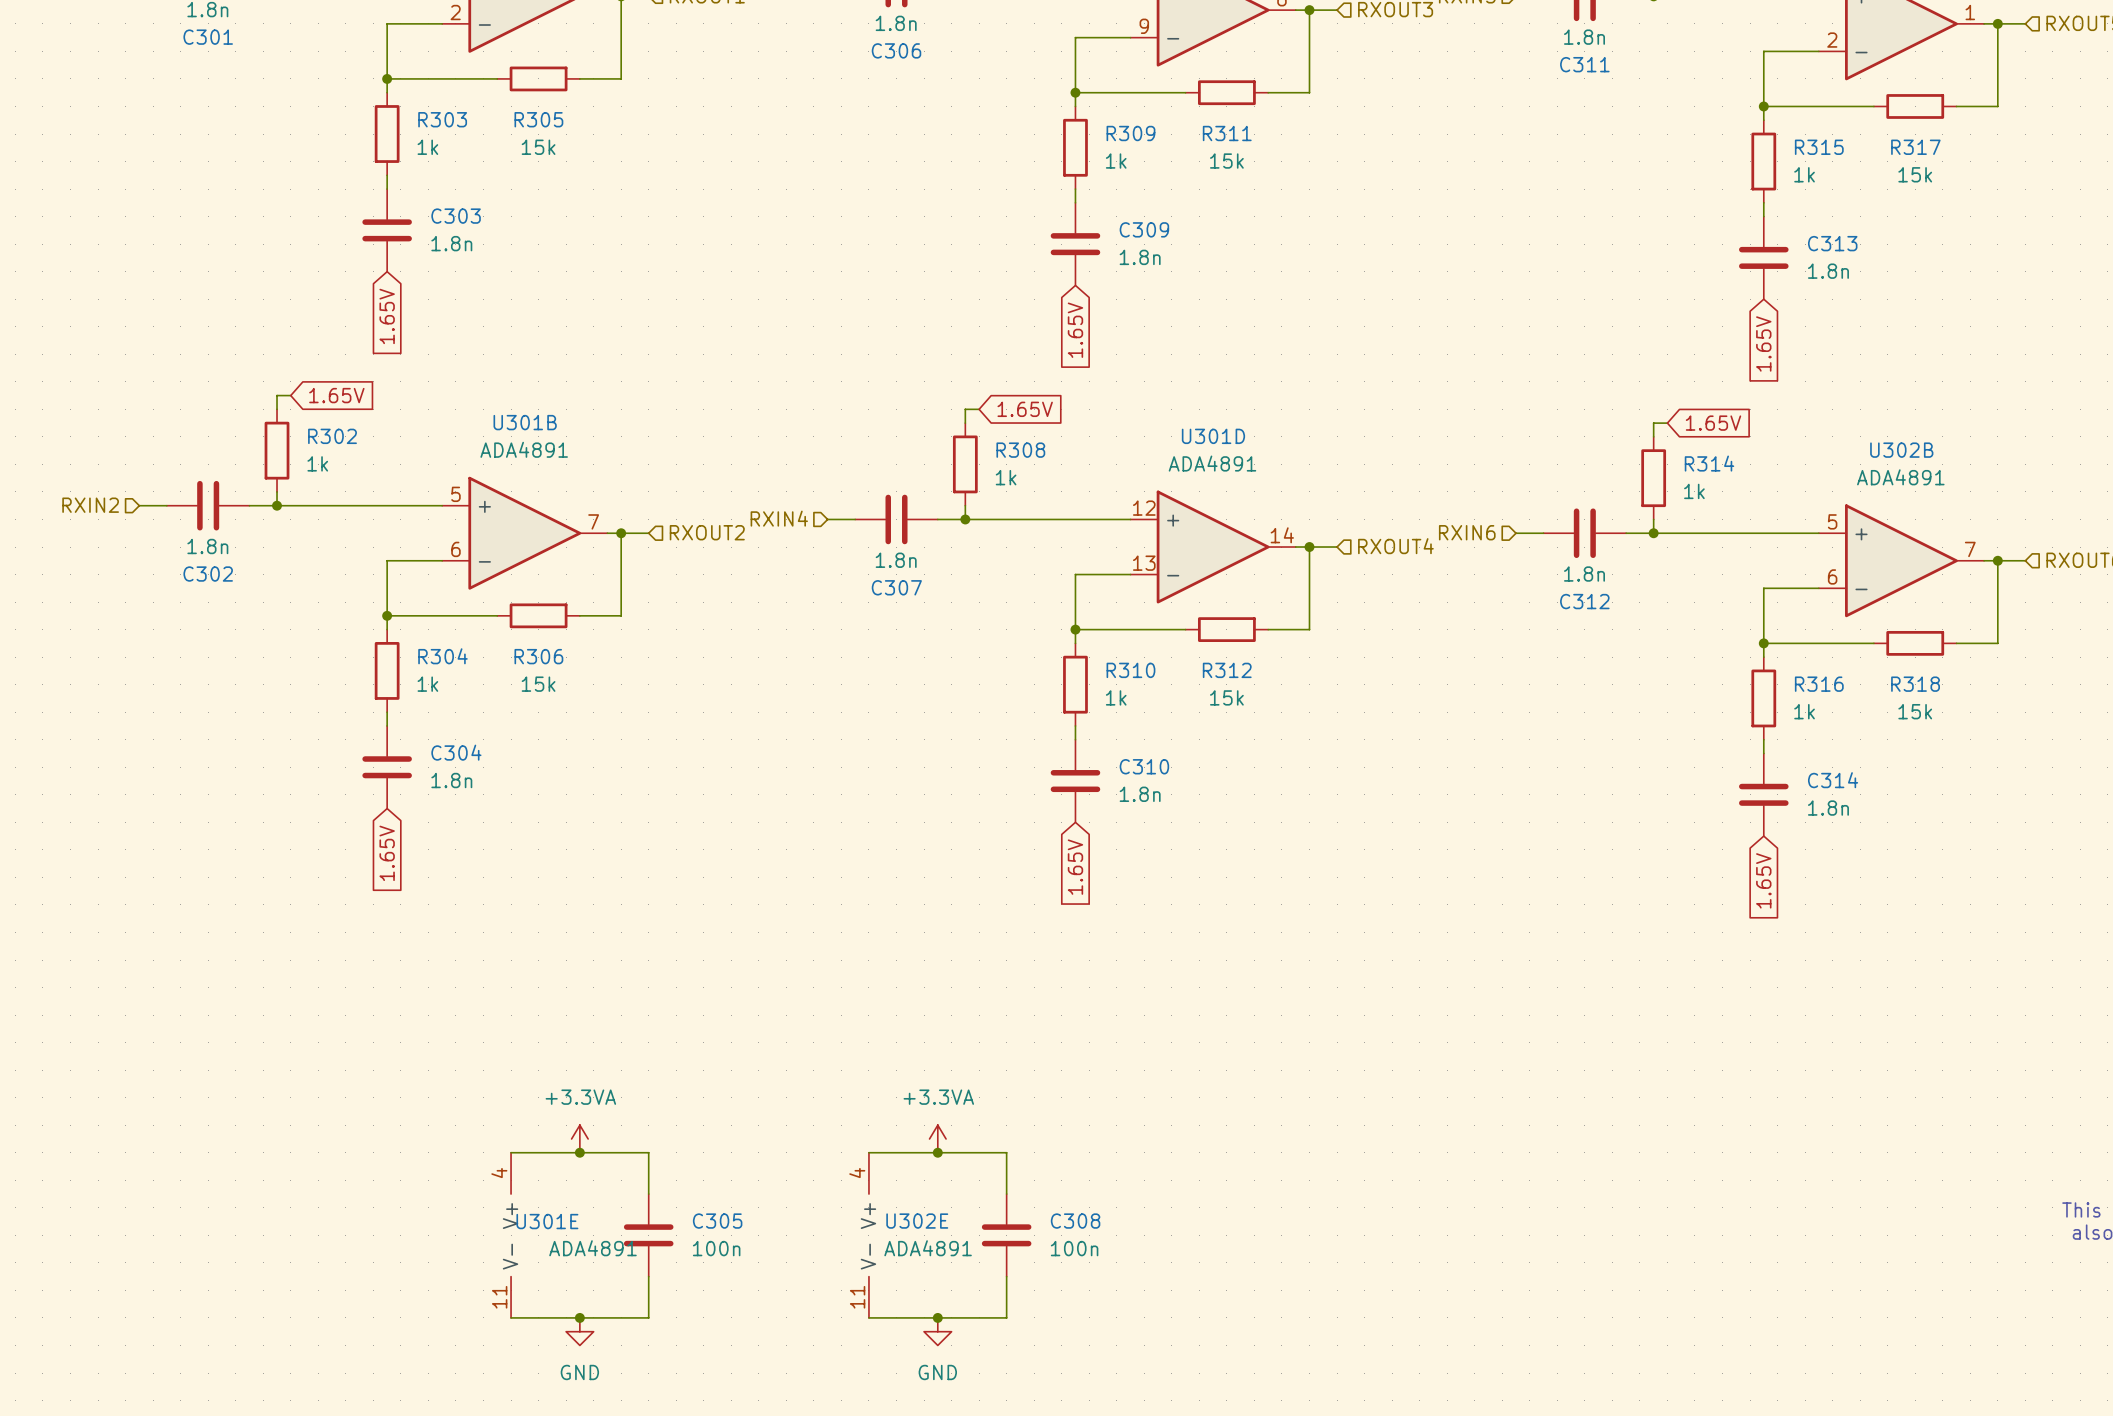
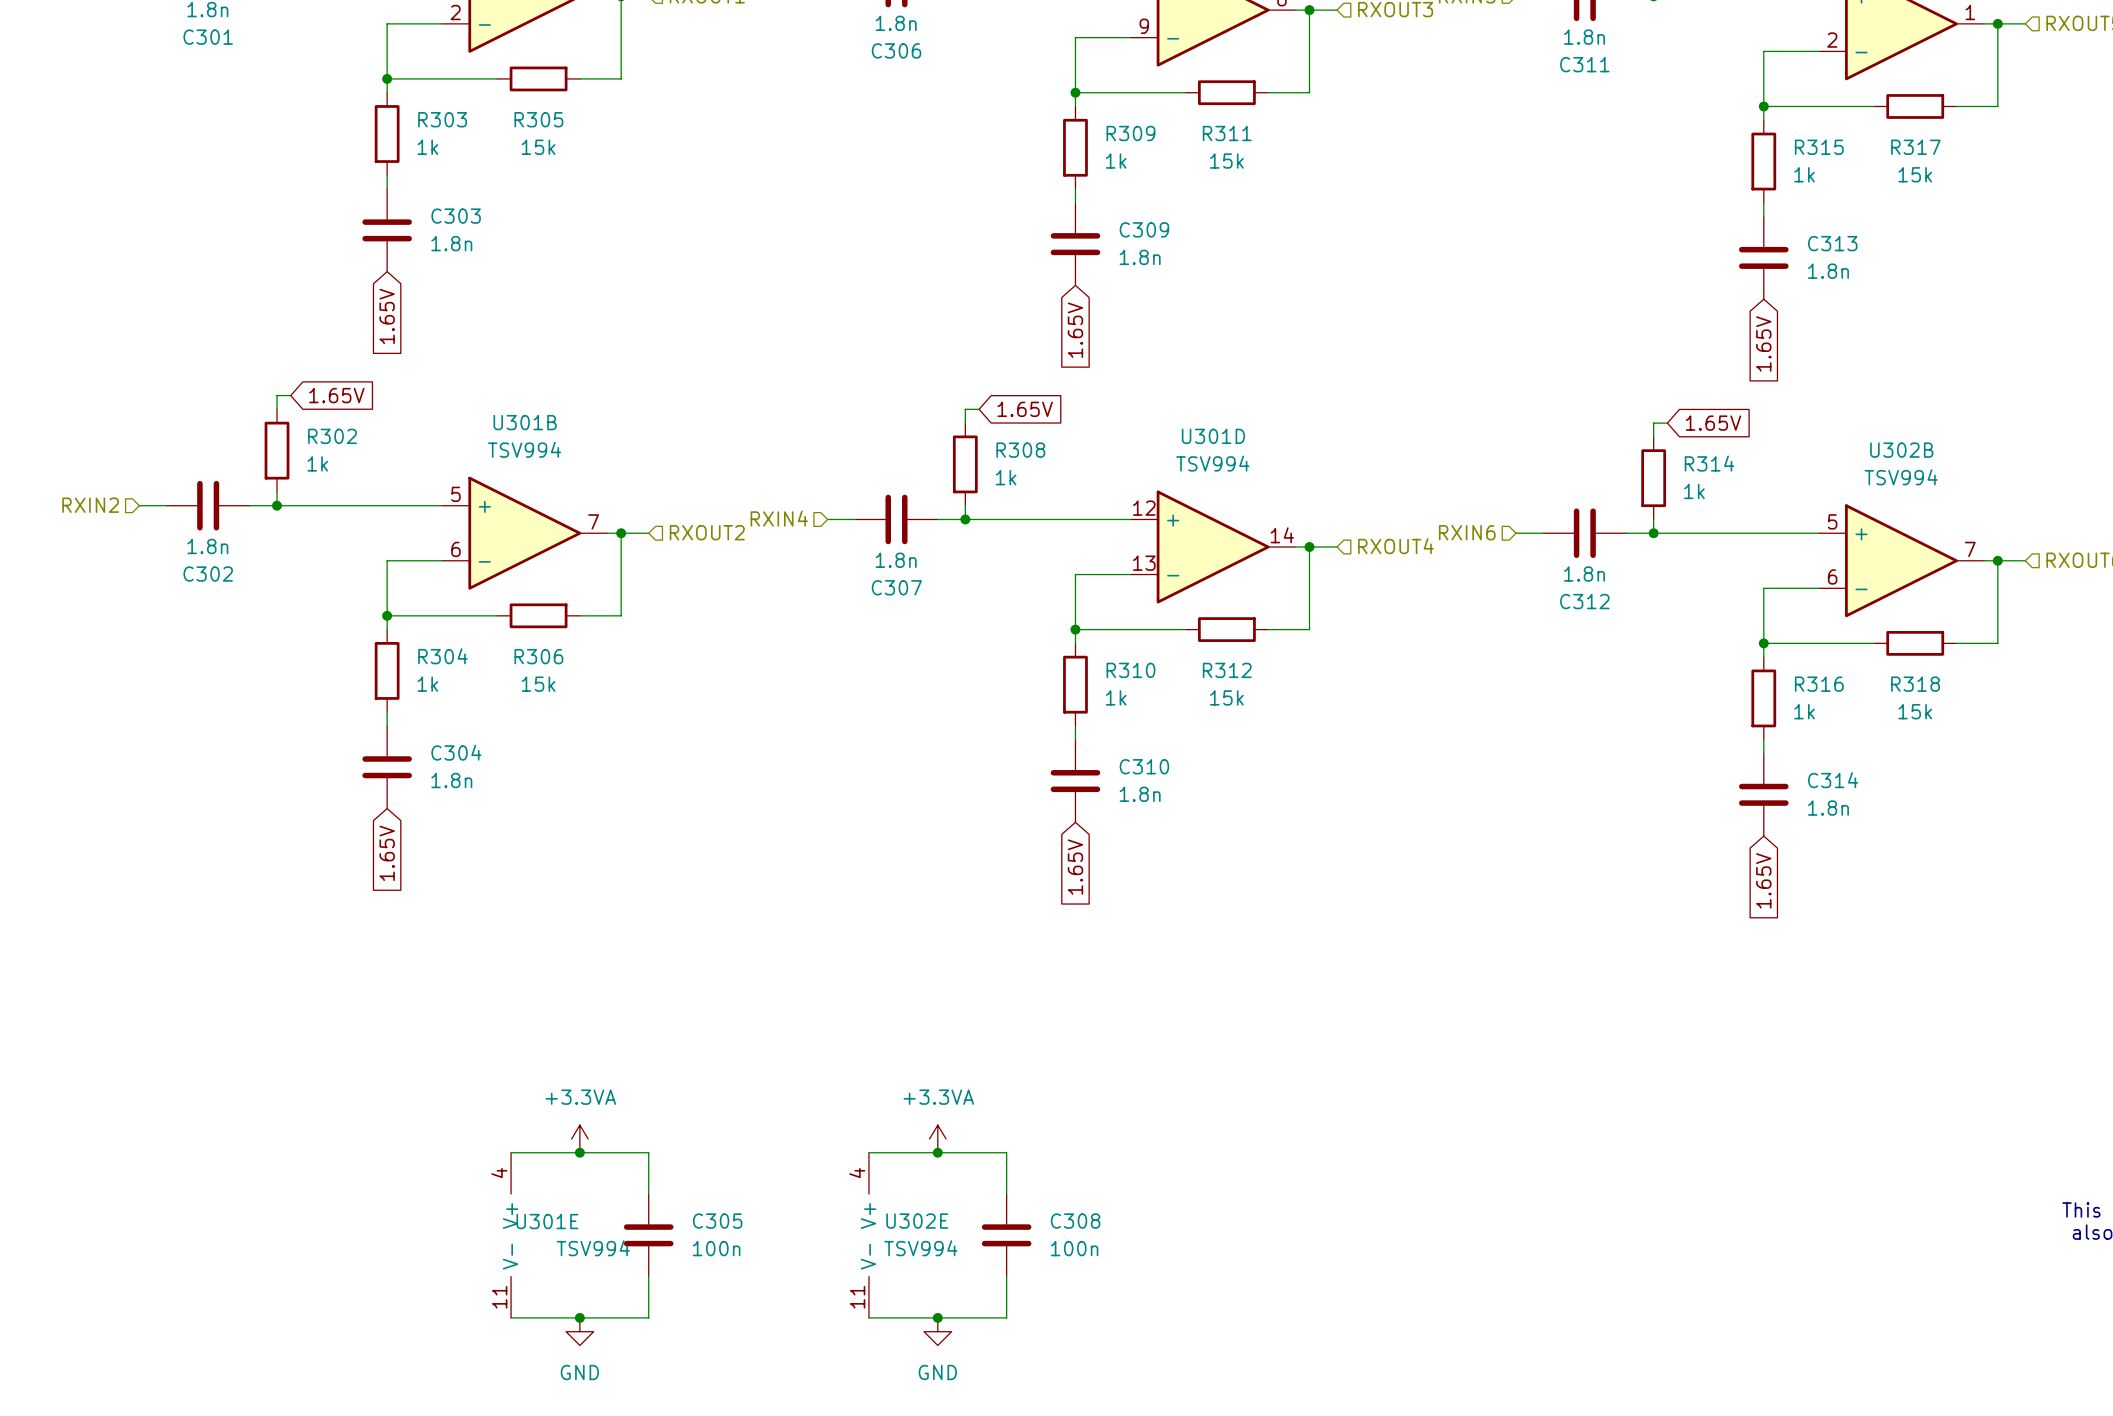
U301B value: ADA4891 (524, 449) -> TSV994 (524, 449)
U301D value: ADA4891 (1212, 463) -> TSV994 (1212, 463)
U302B value: ADA4891 (1900, 477) -> TSV994 (1901, 477)
U301E value: ADA4891 (592, 1248) -> TSV994 (593, 1248)
U302E value: ADA4891 (928, 1248) -> TSV994 (920, 1248)

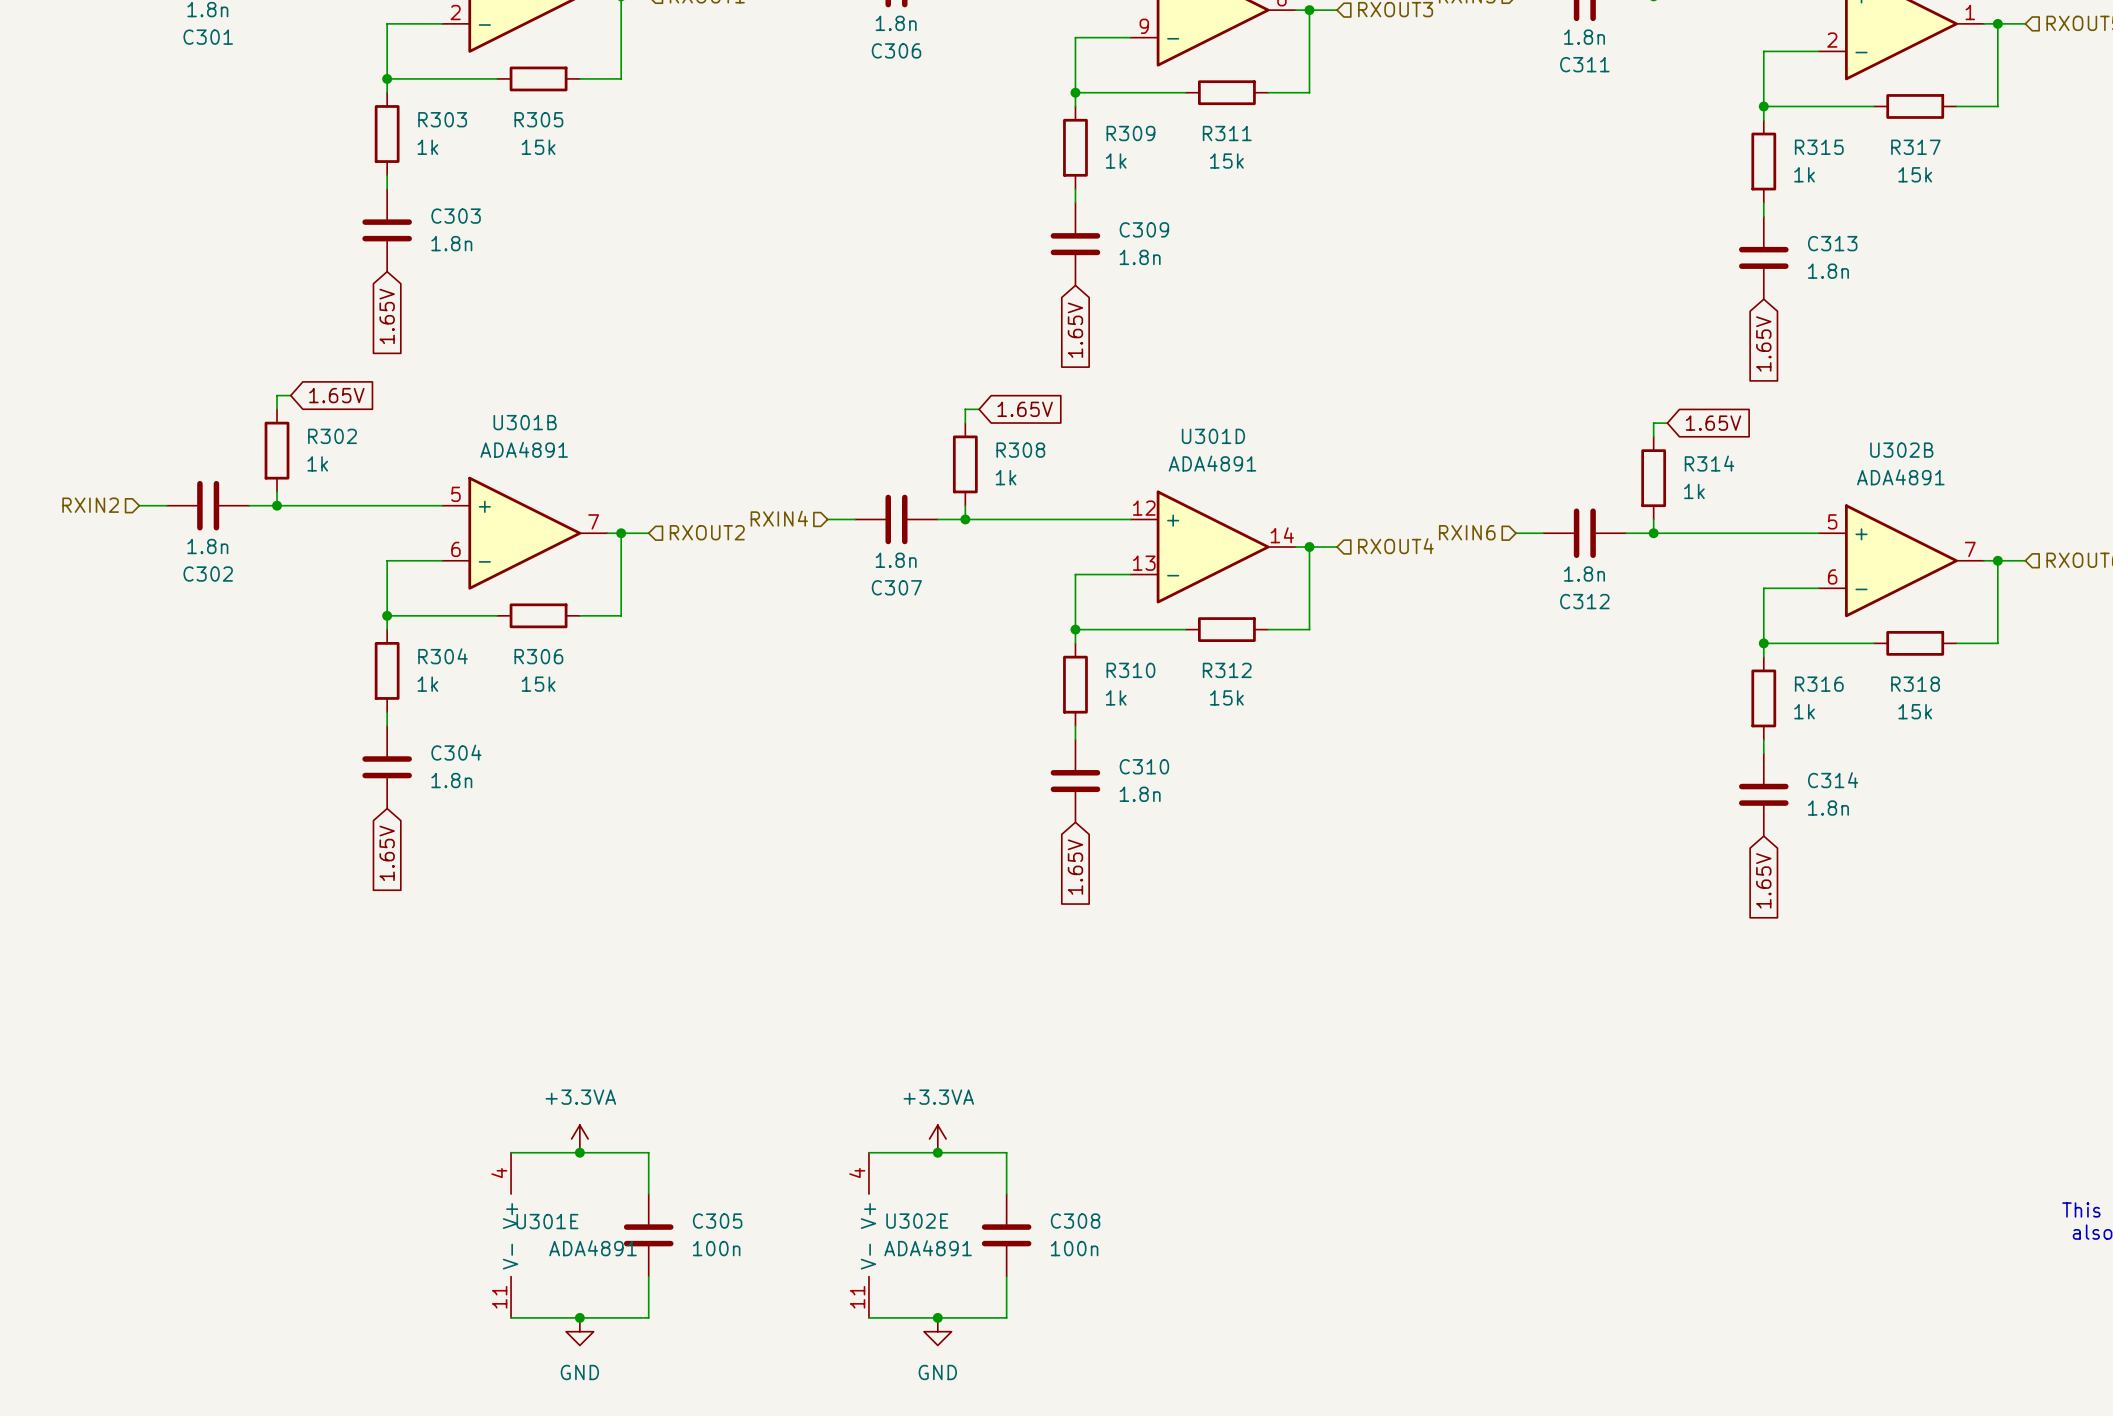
U301B value: TSV994 (524, 449) -> ADA4891 (524, 449)
U301D value: TSV994 (1212, 463) -> ADA4891 (1212, 463)
U302B value: TSV994 (1901, 477) -> ADA4891 (1900, 477)
U301E value: TSV994 (593, 1248) -> ADA4891 (592, 1248)
U302E value: TSV994 (920, 1248) -> ADA4891 (928, 1248)

